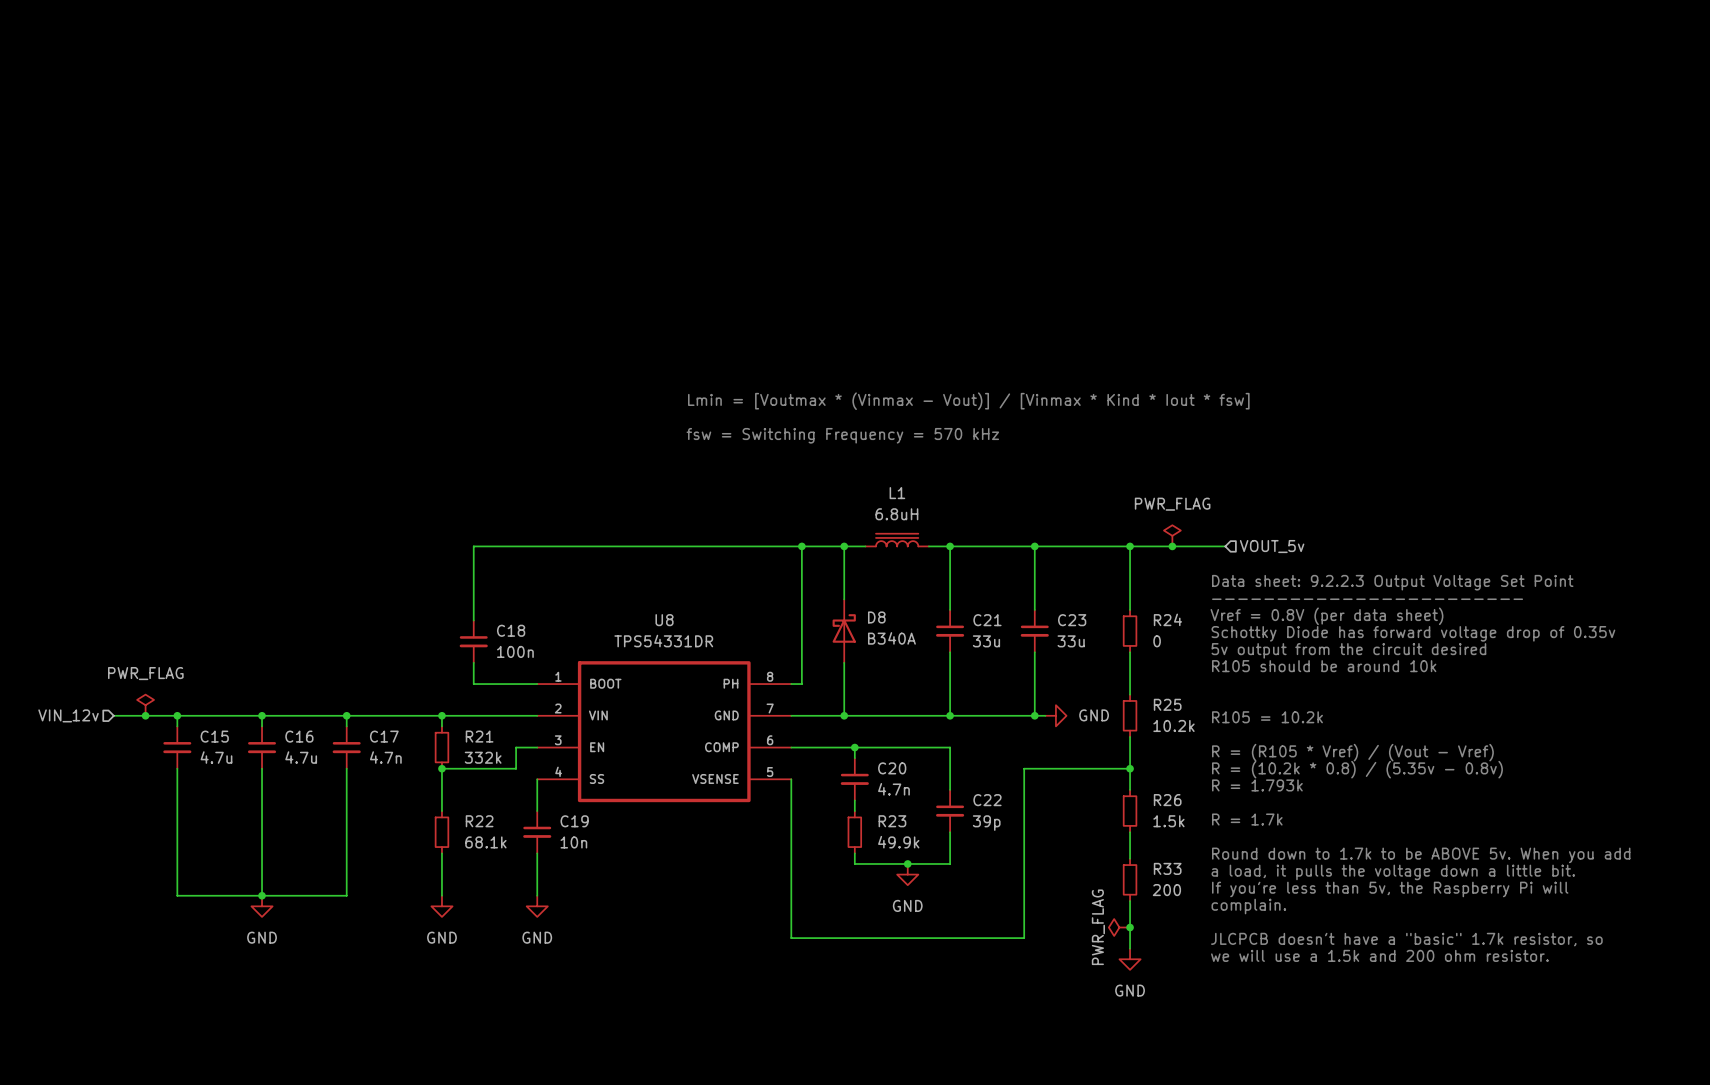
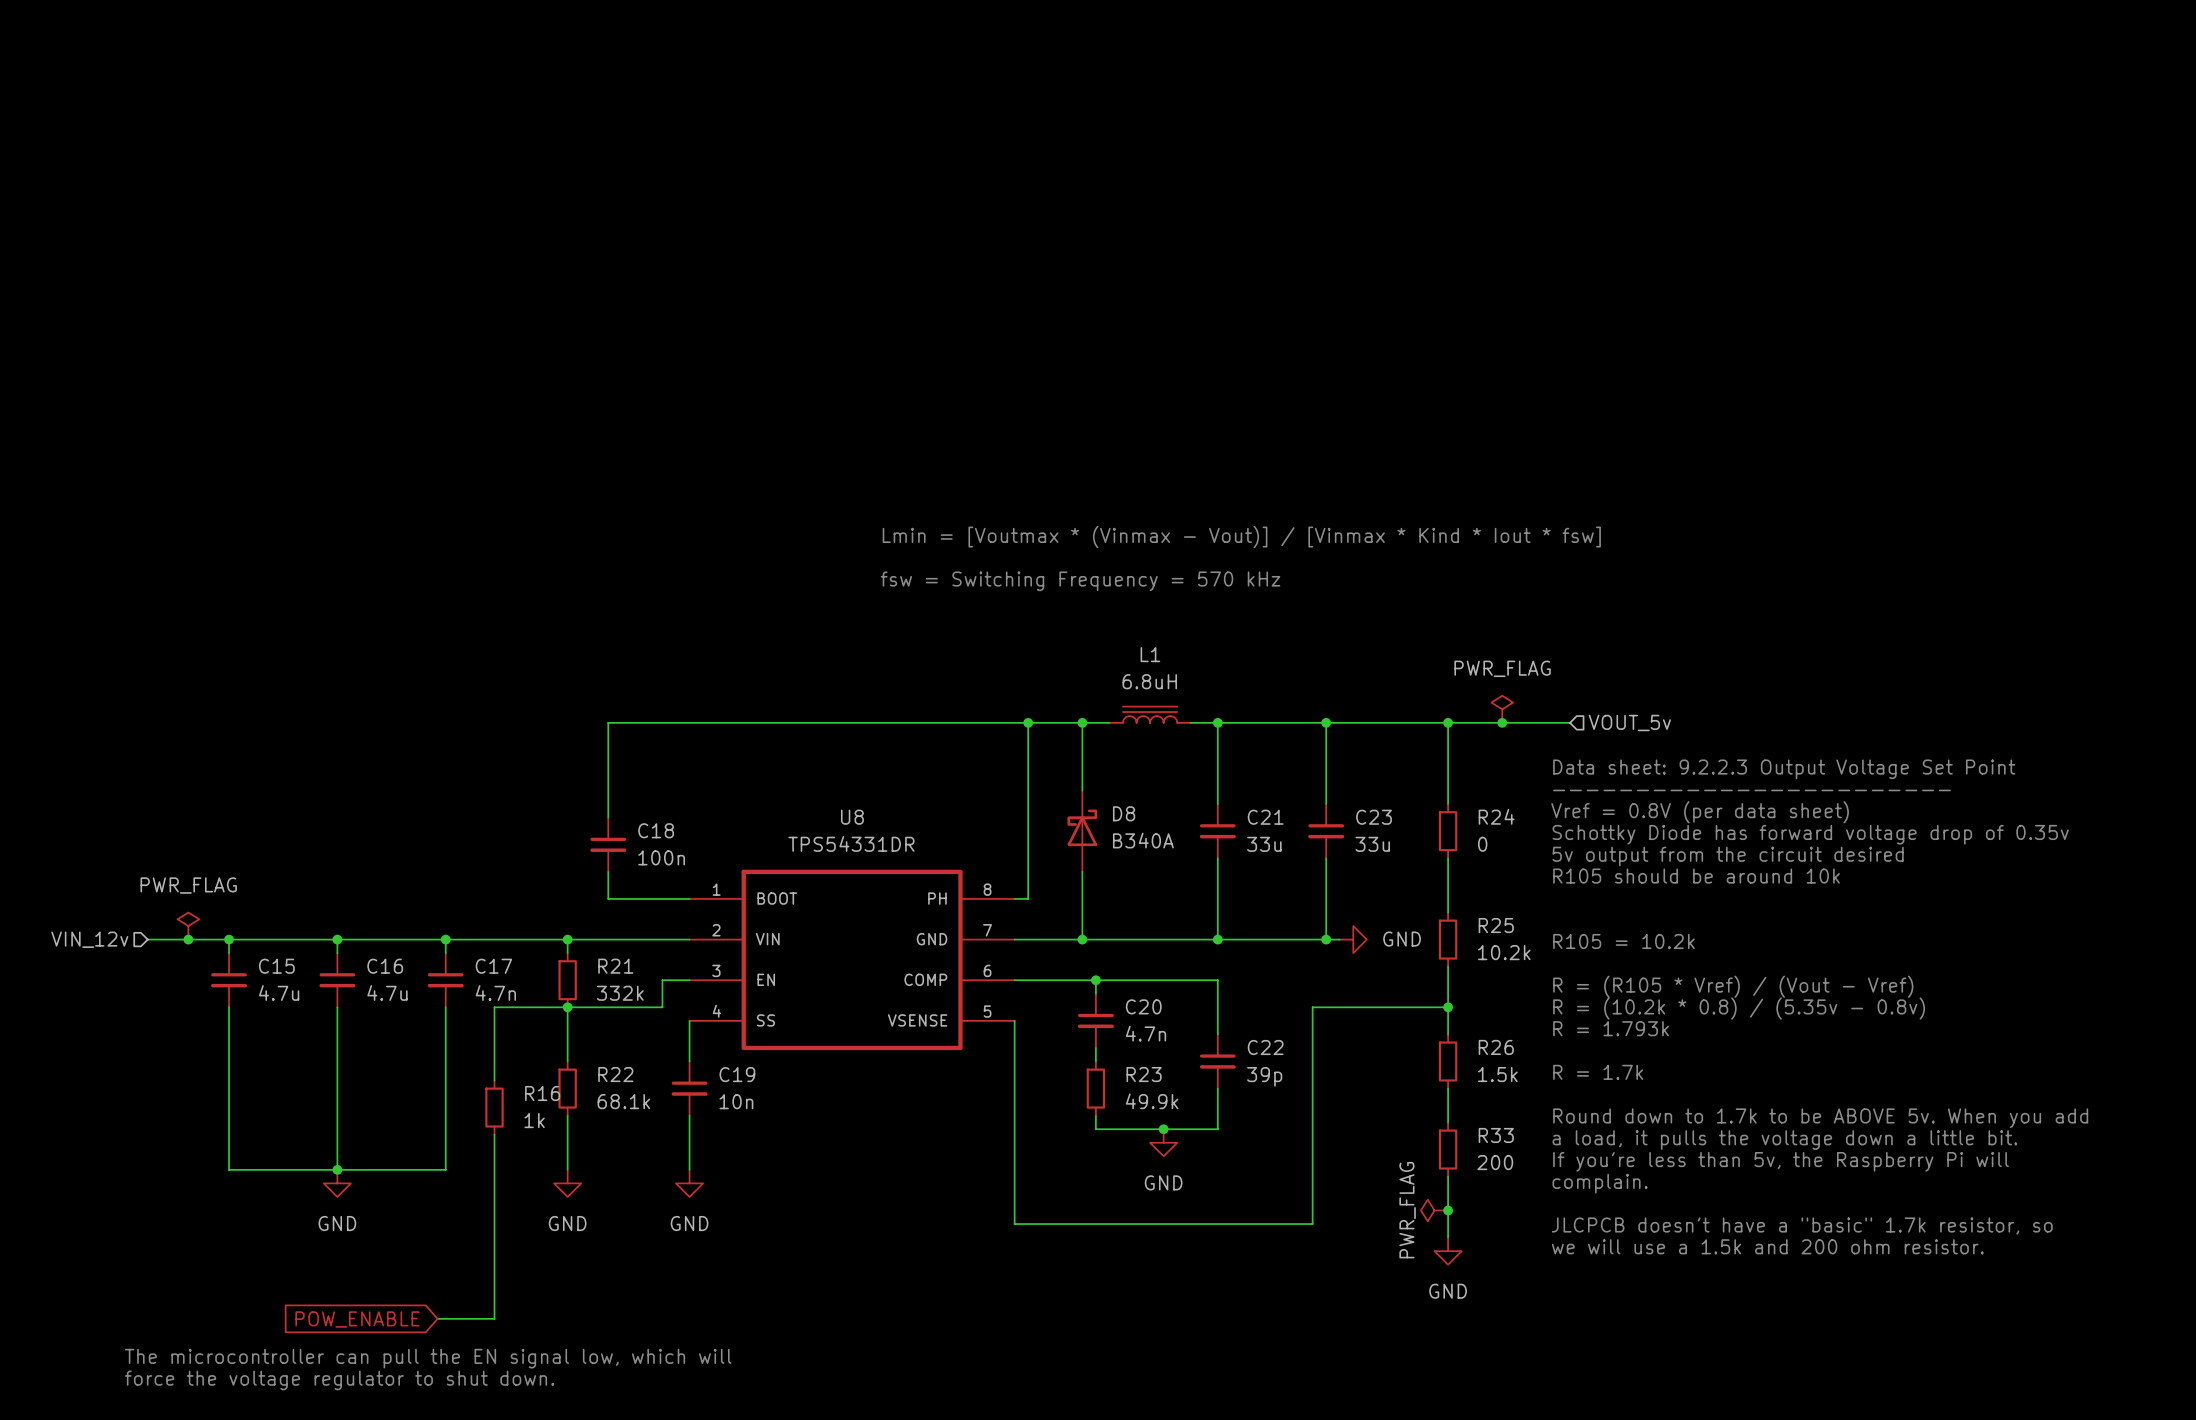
wire: none -> (567, 1007) (494, 1007) (494, 1080)
R16: none -> 1k (494, 1107)
wire: none -> (494, 1134) (494, 1318) (437, 1318)
global label: none -> POW_ENABLE (357, 1319)
text: none -> The microcontroller can pull the EN signal low, which will (428, 1358)
text: none -> force the voltage regulator to shut down. (339, 1380)

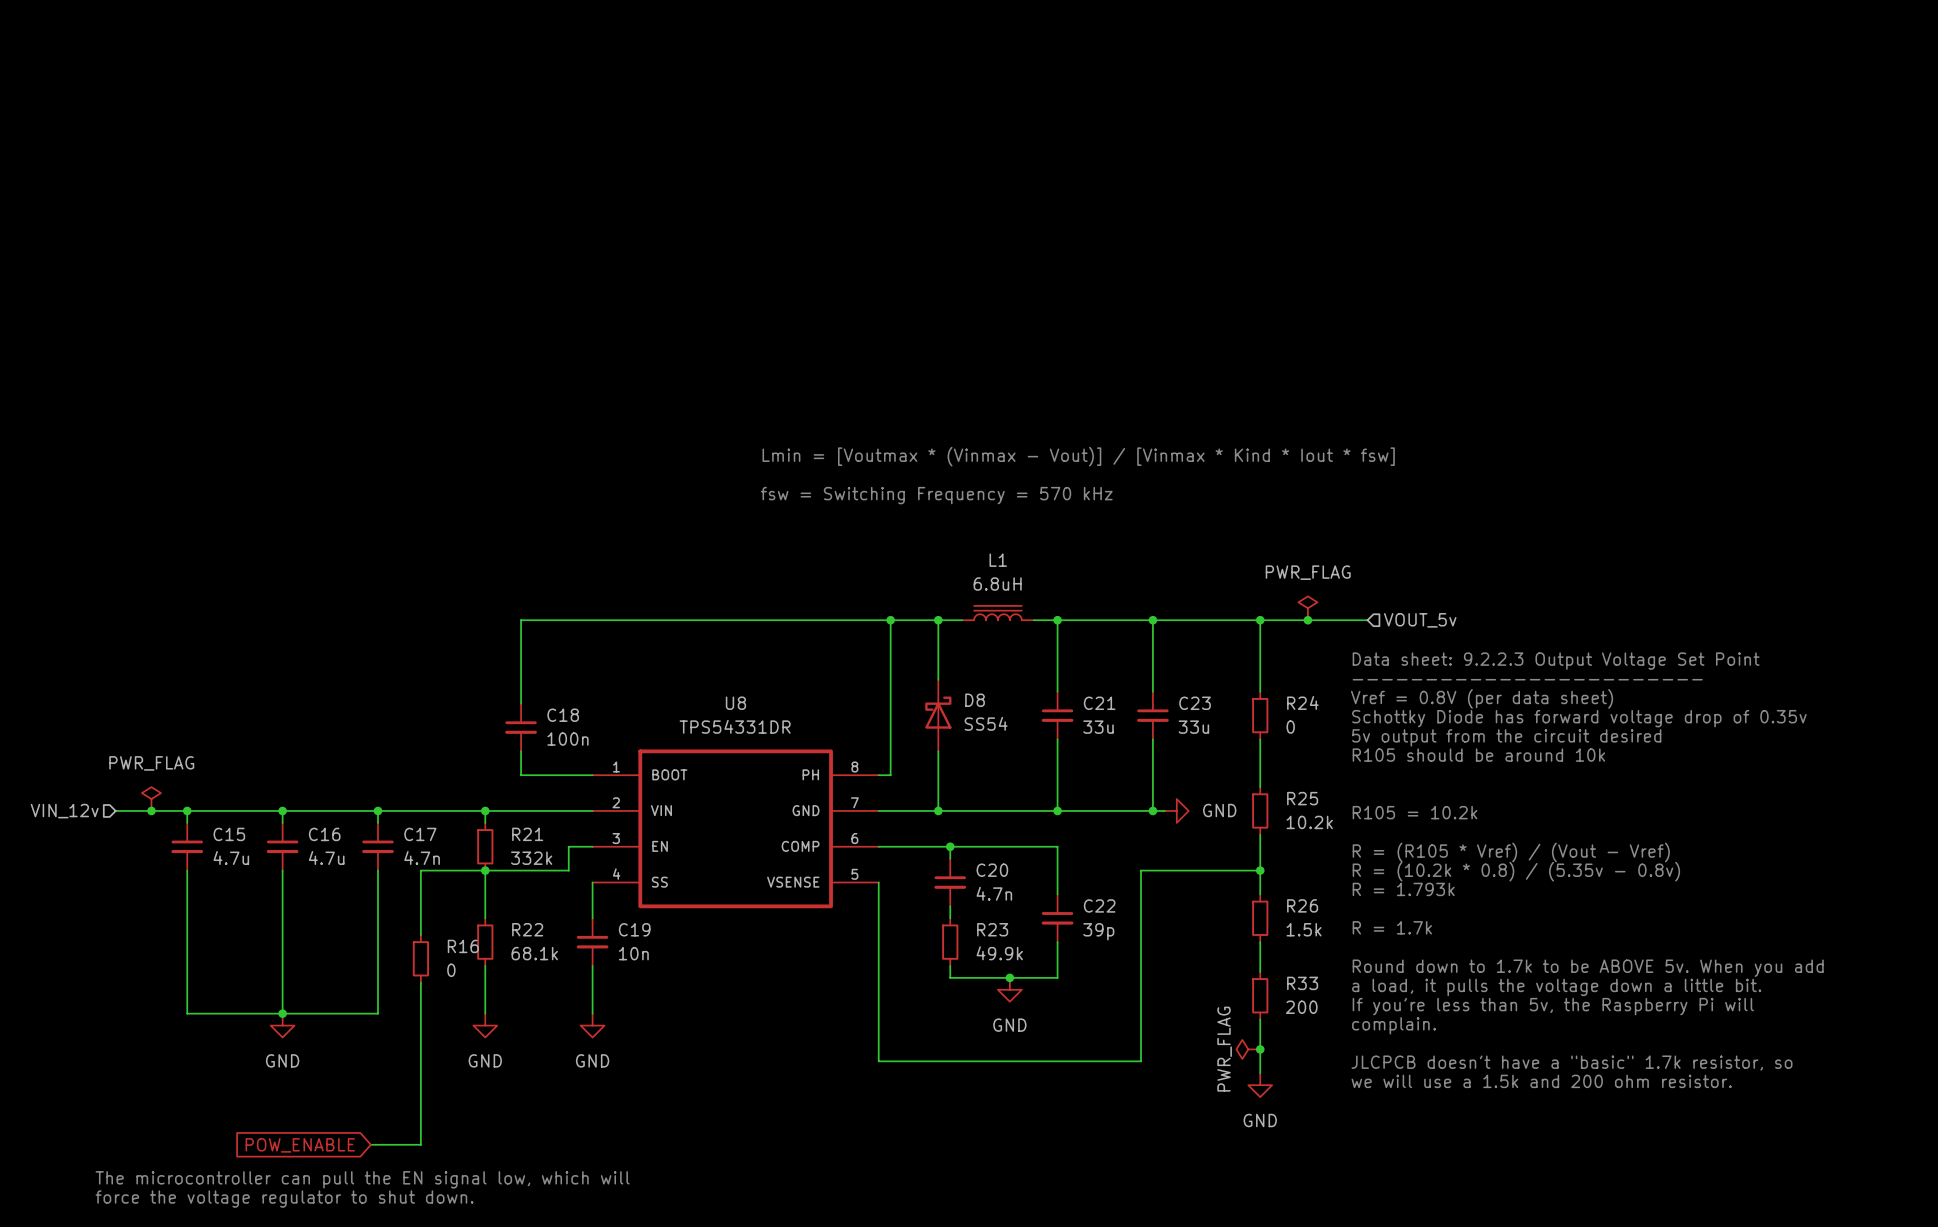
D8 value: B340A (1143, 840) -> SS54 (986, 723)
R16 value: 1k (534, 1120) -> 0 (451, 970)

